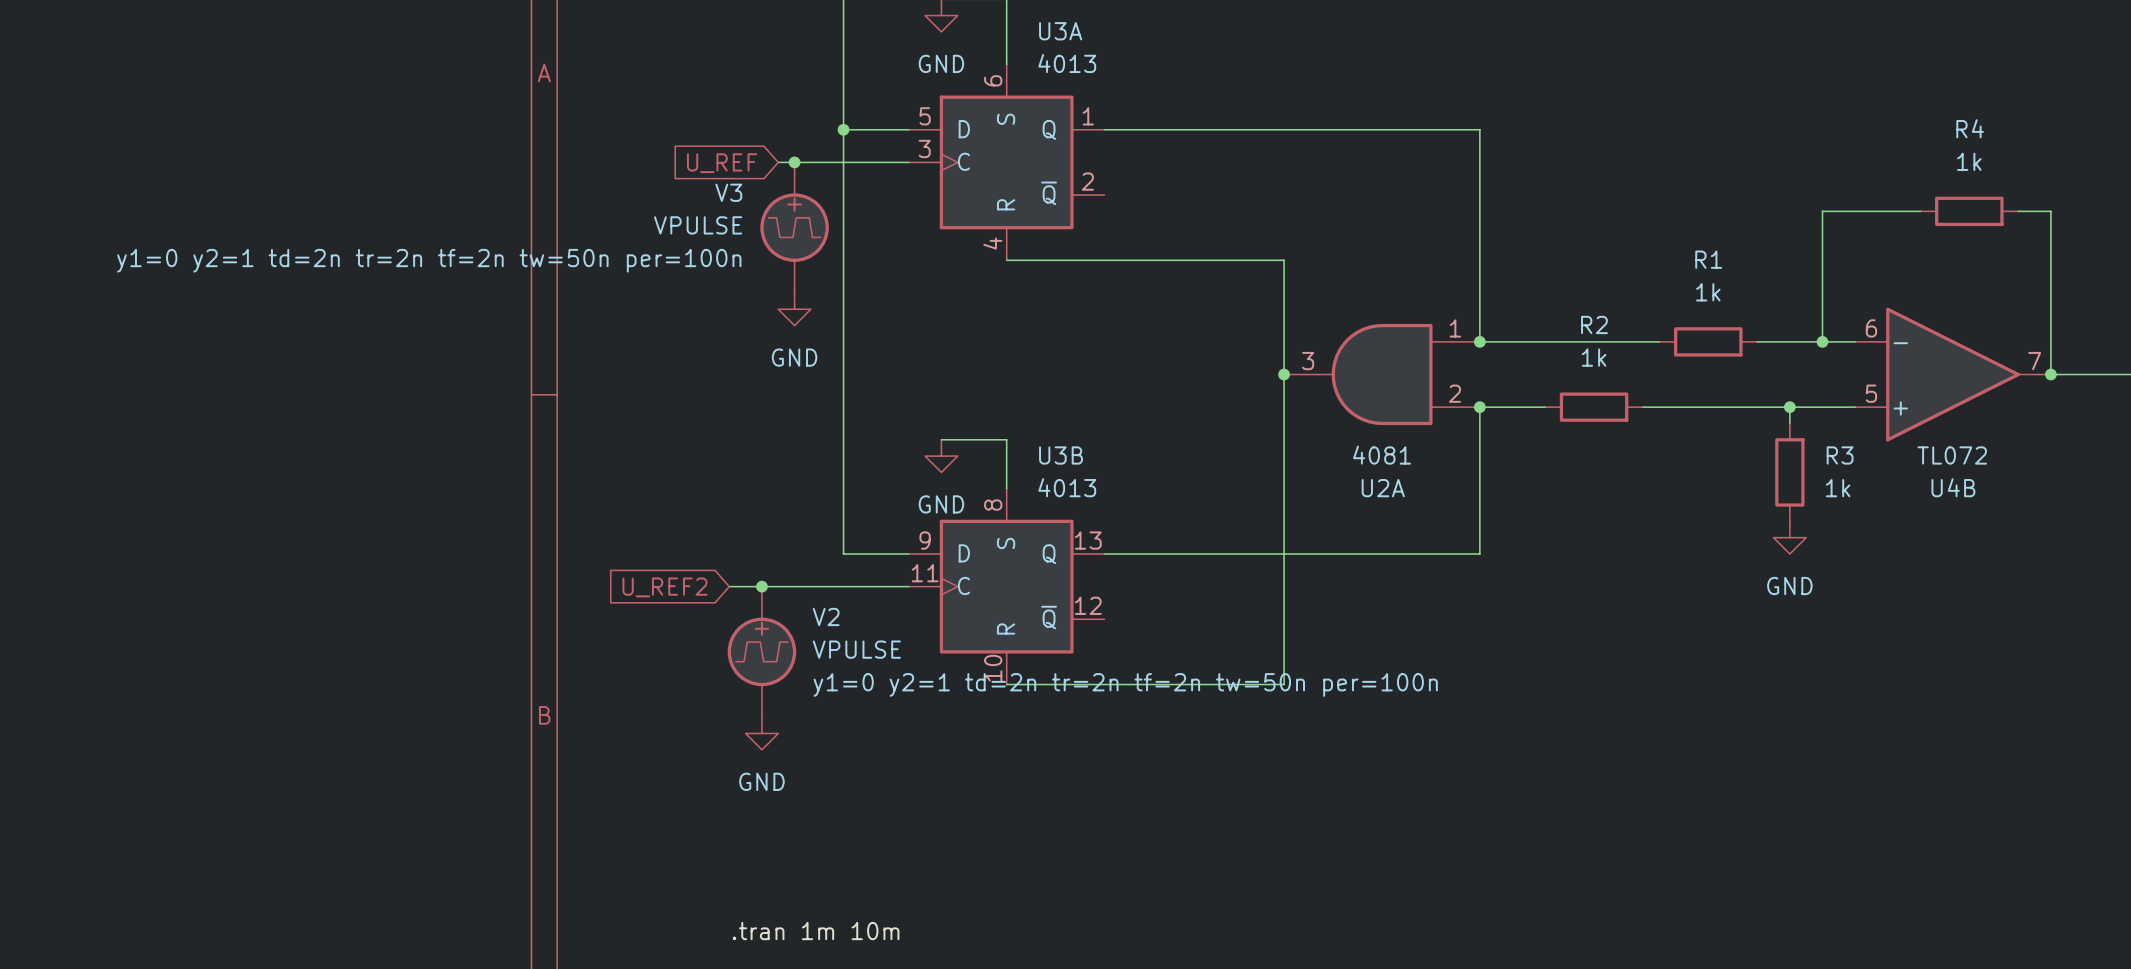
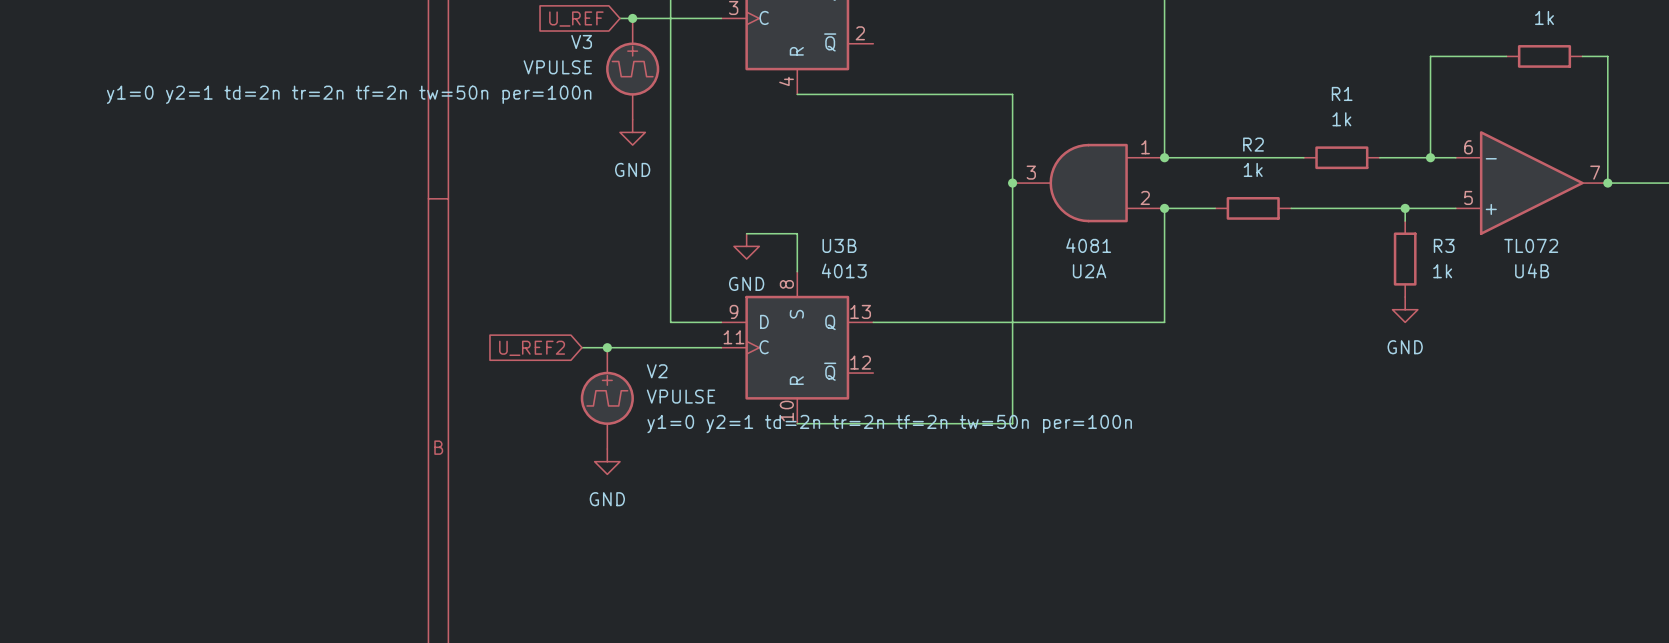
label: .tran 1m 10m (816, 931) -> none

